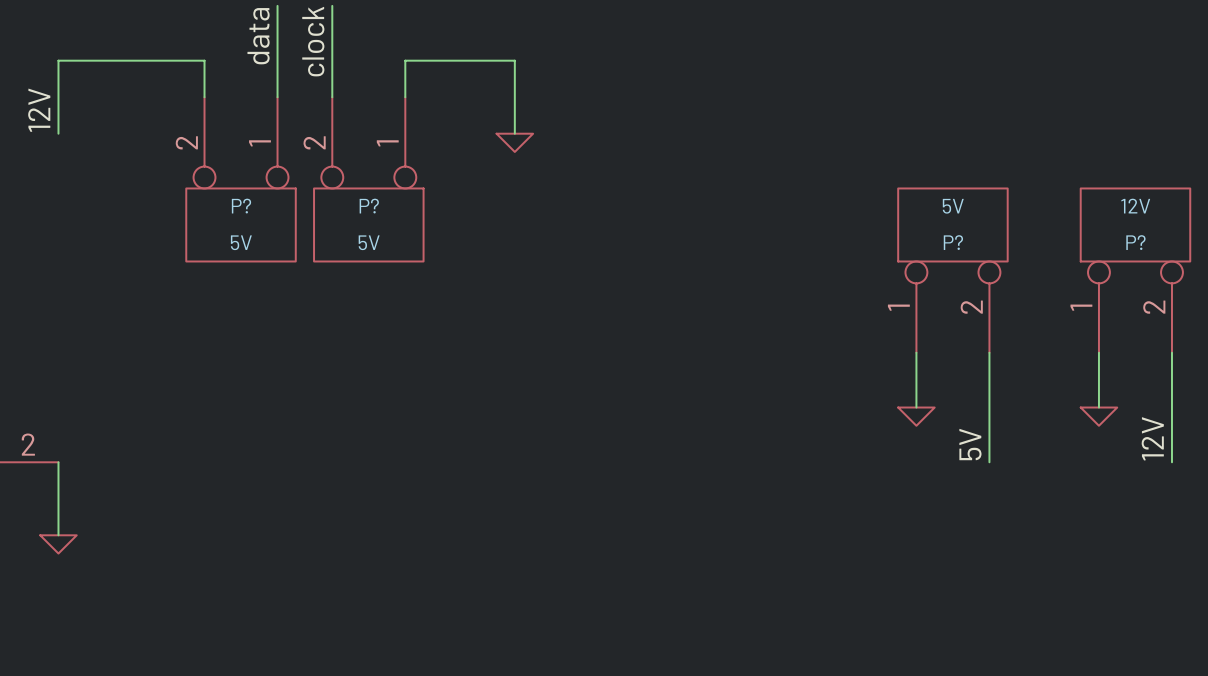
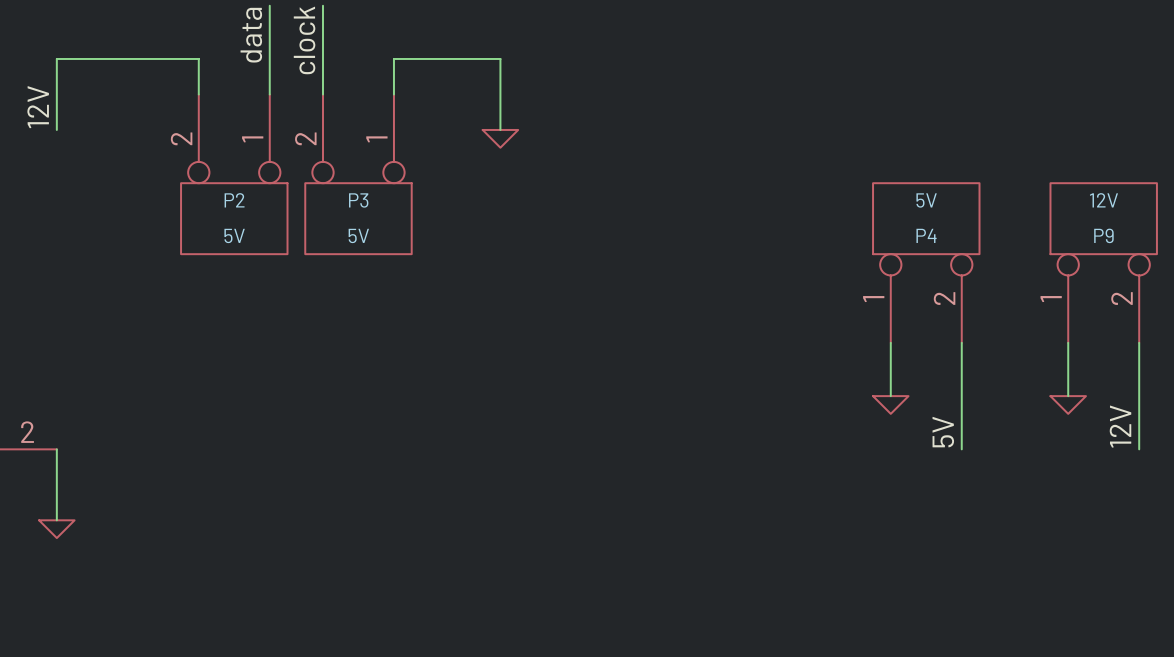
P? name: P? (241, 206) -> P2 (234, 200)
P? name: P? (369, 206) -> P3 (358, 200)
P? name: P? (953, 242) -> P4 (926, 235)
P? name: P? (1135, 242) -> P9 (1103, 235)

